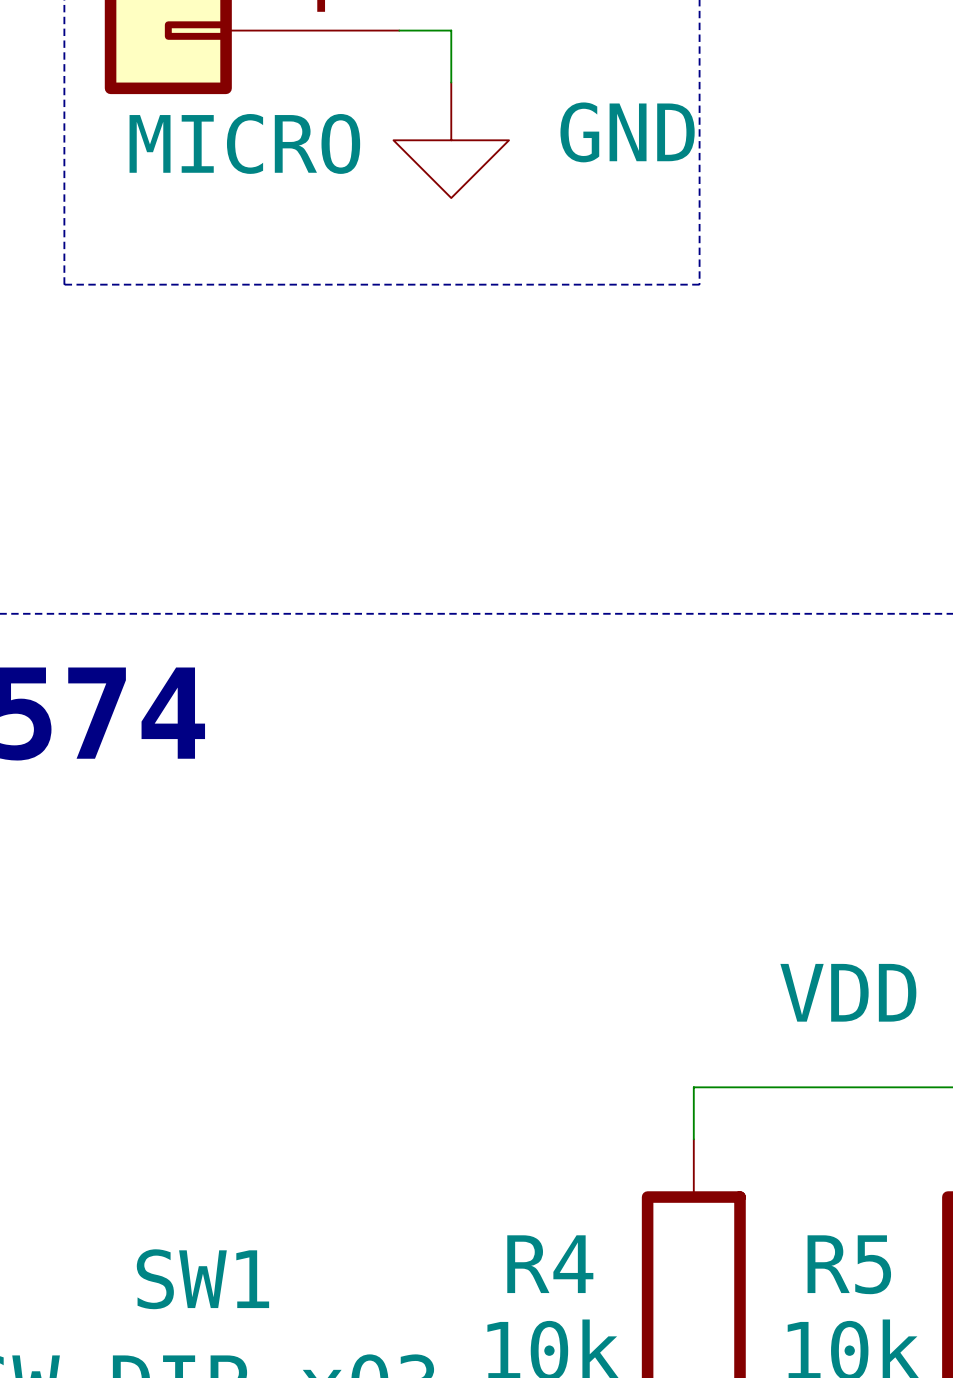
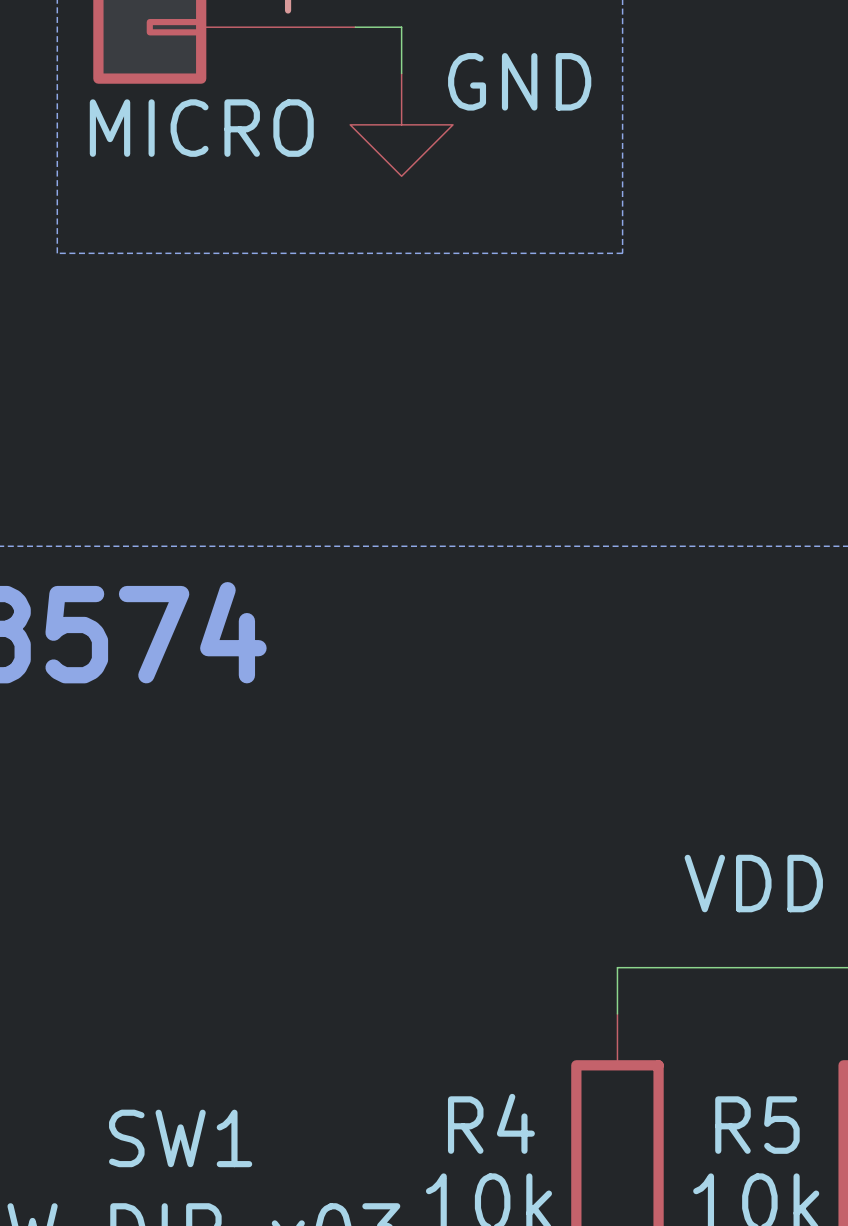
power symbol text position: GND (627, 132) -> GND (519, 81)

